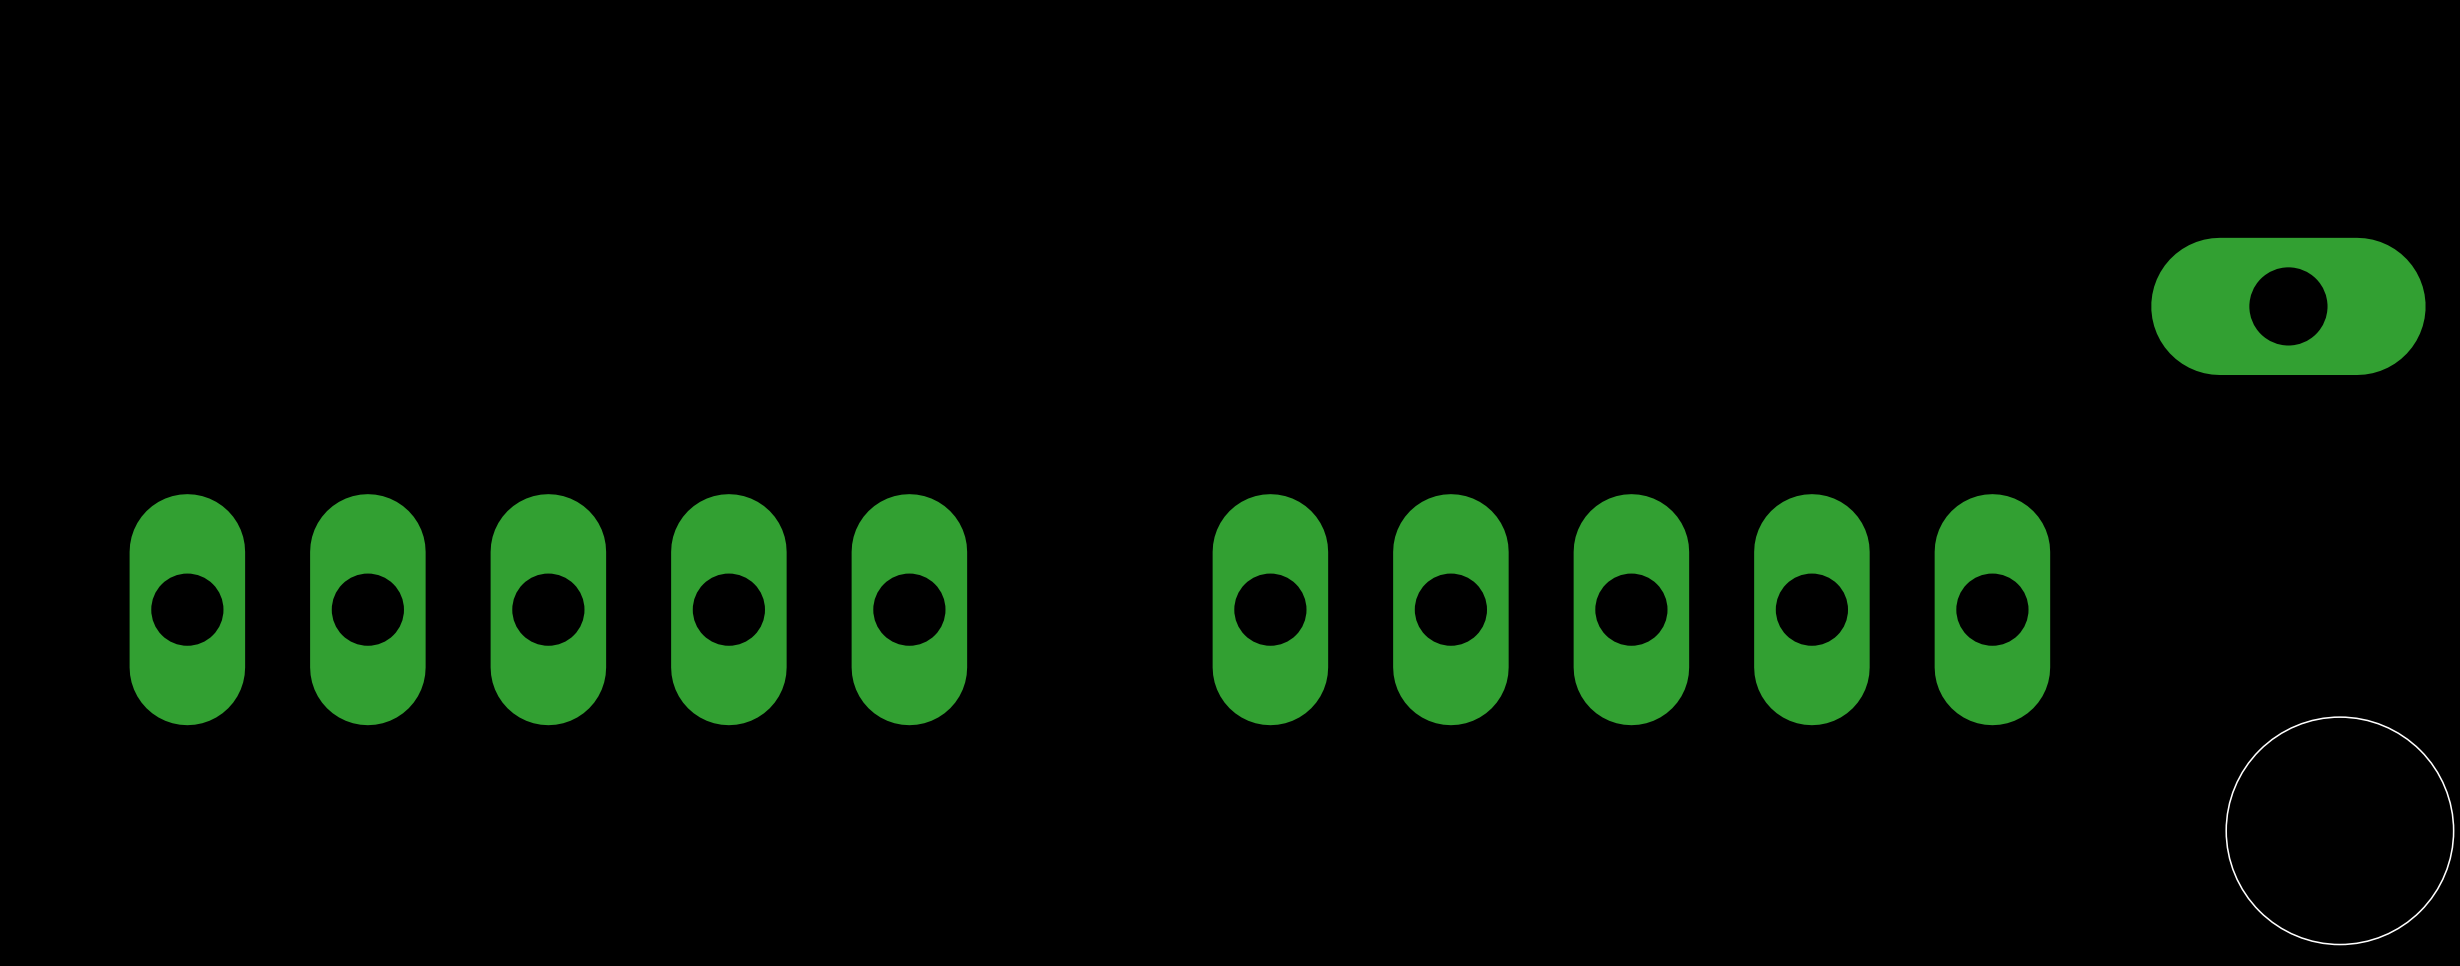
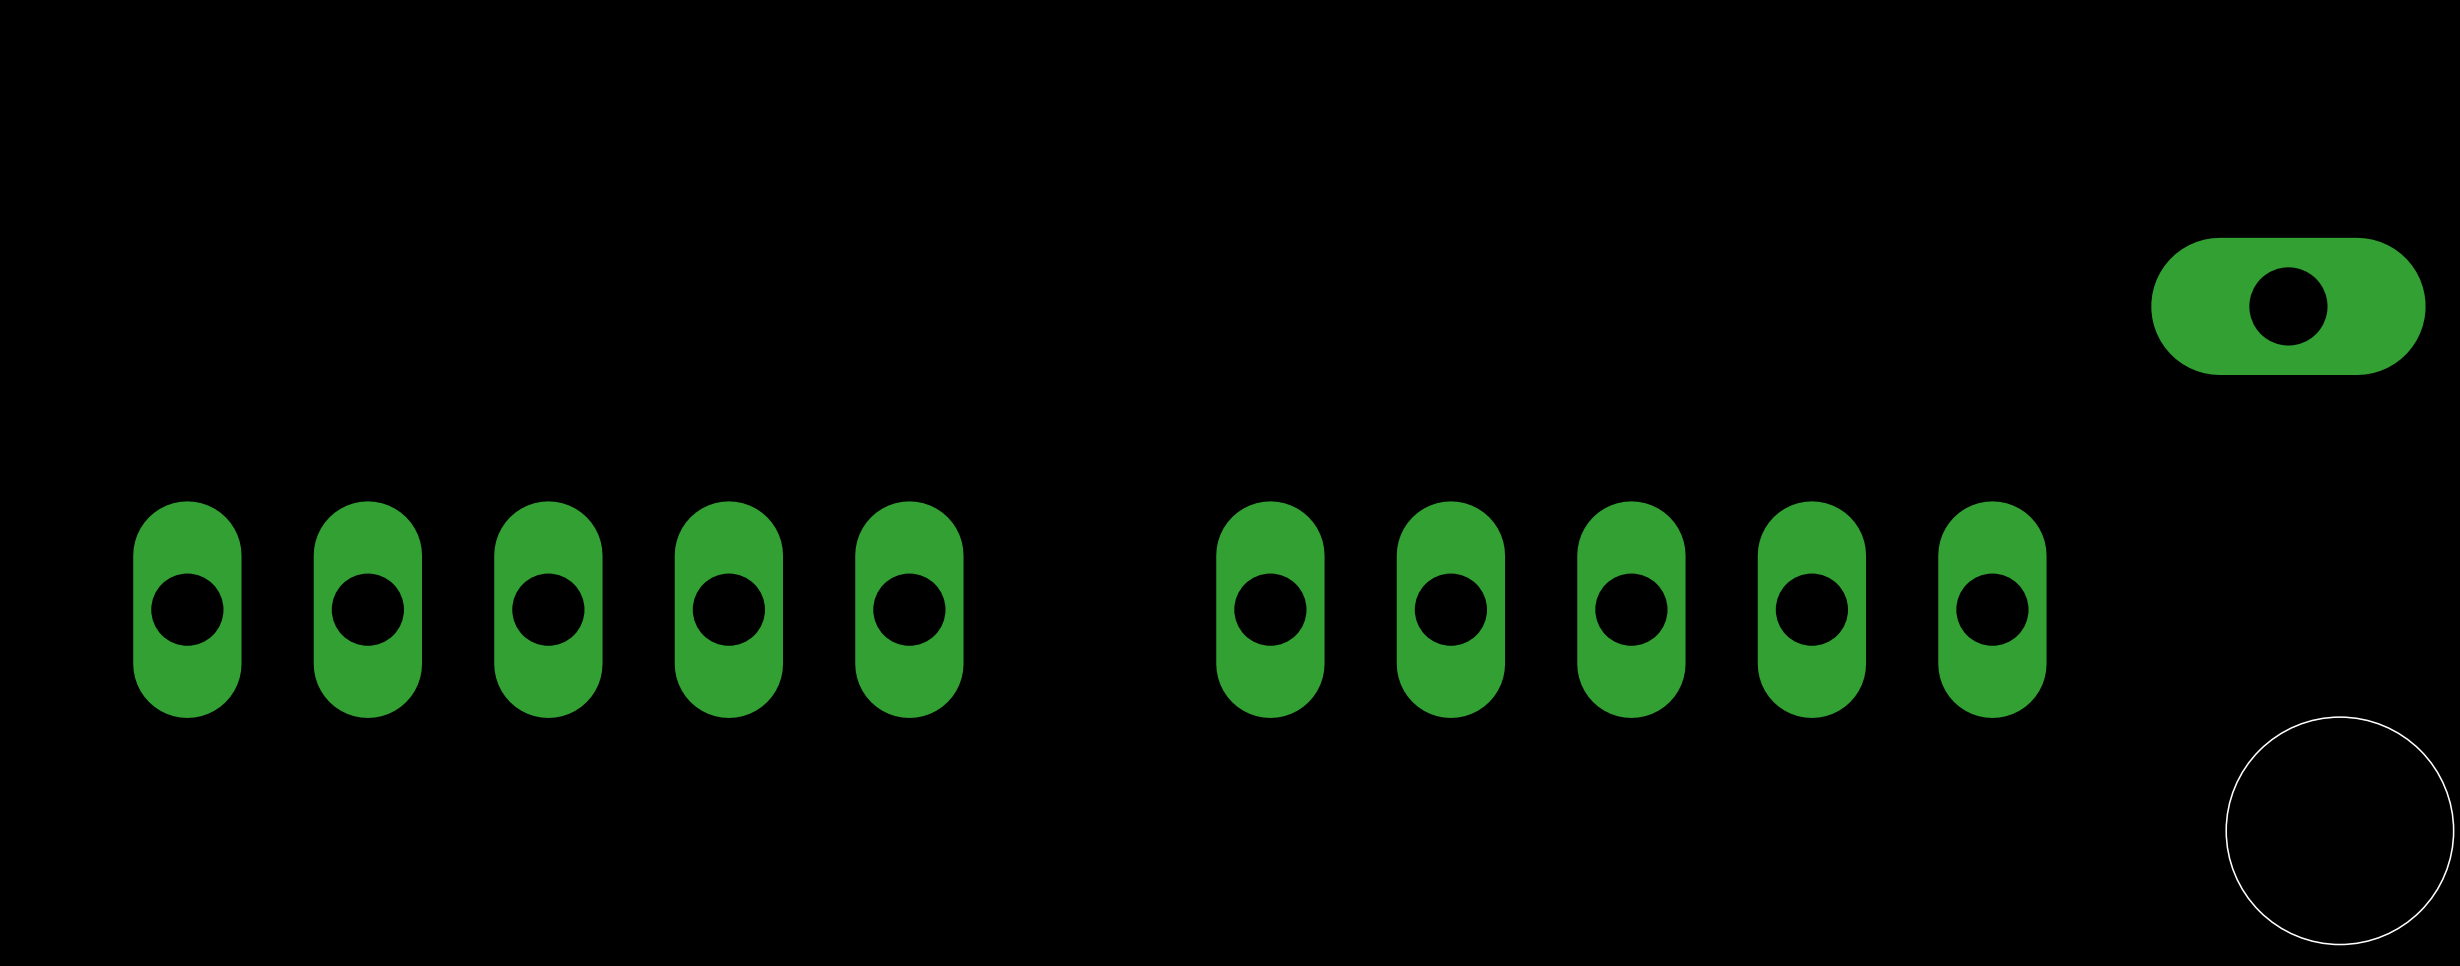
part footprint: [129, 494, 968, 726] -> [133, 501, 964, 718]
part footprint: [1212, 494, 2051, 726] -> [1216, 501, 2047, 718]

